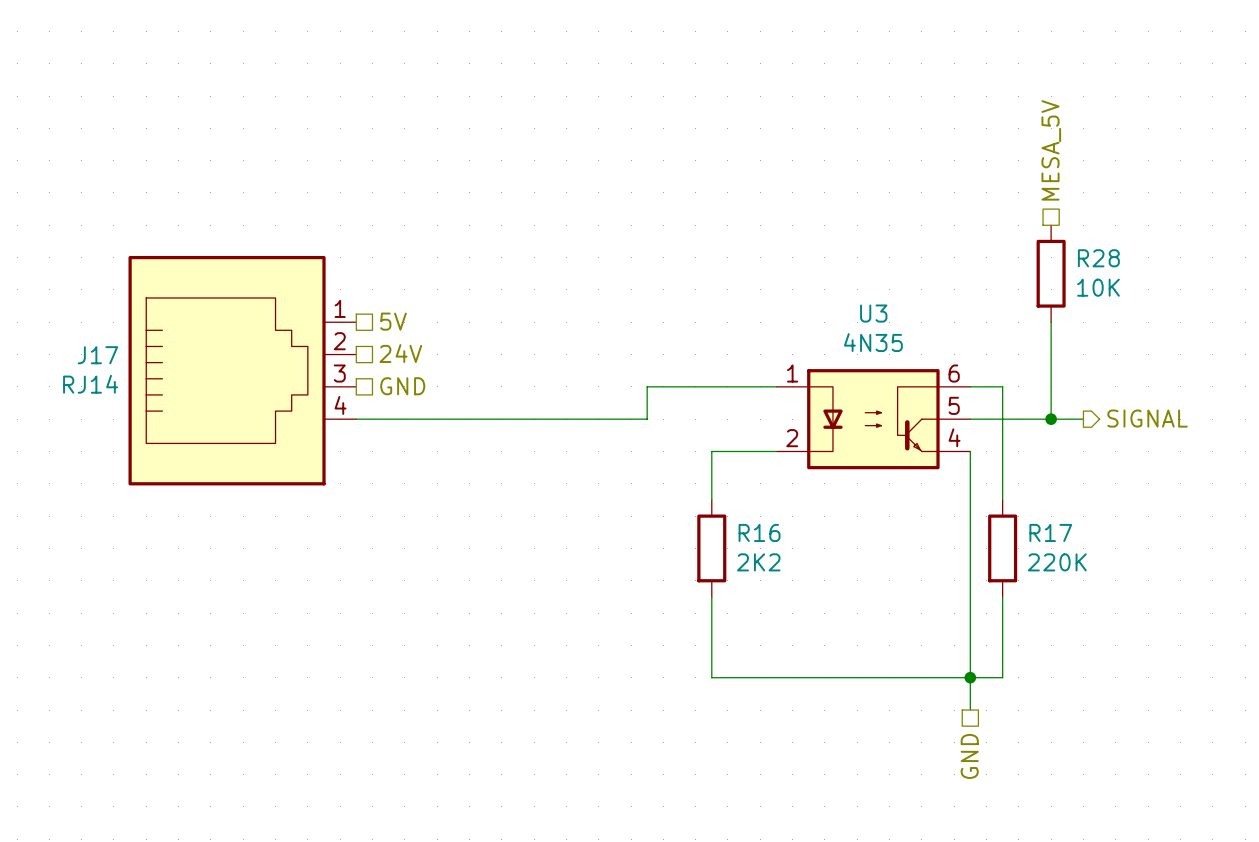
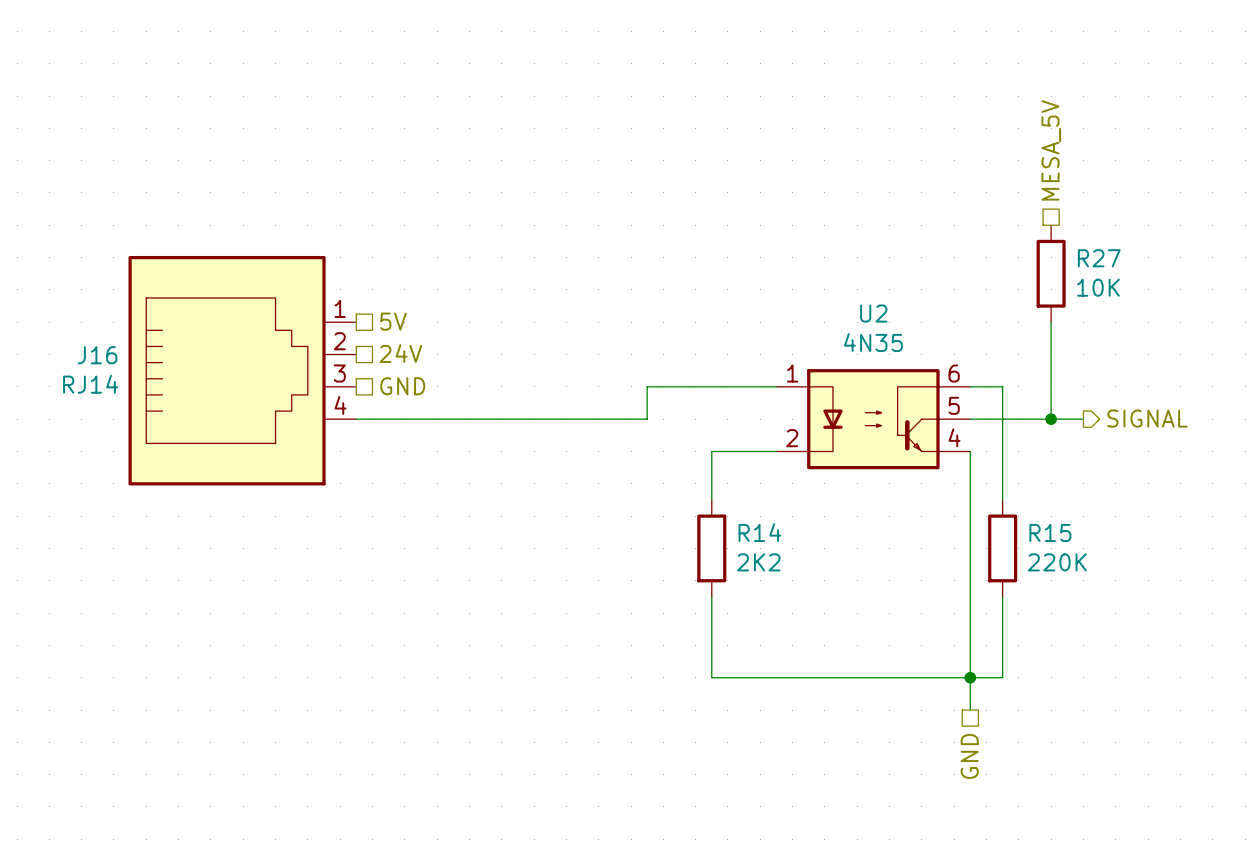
R28 name: R28 (1098, 258) -> R27 (1099, 258)
U3 name: U3 (873, 313) -> U2 (873, 313)
J17 name: J17 (97, 355) -> J16 (97, 355)
R16 name: R16 (759, 532) -> R14 (759, 532)
R17 name: R17 (1050, 532) -> R15 (1050, 532)

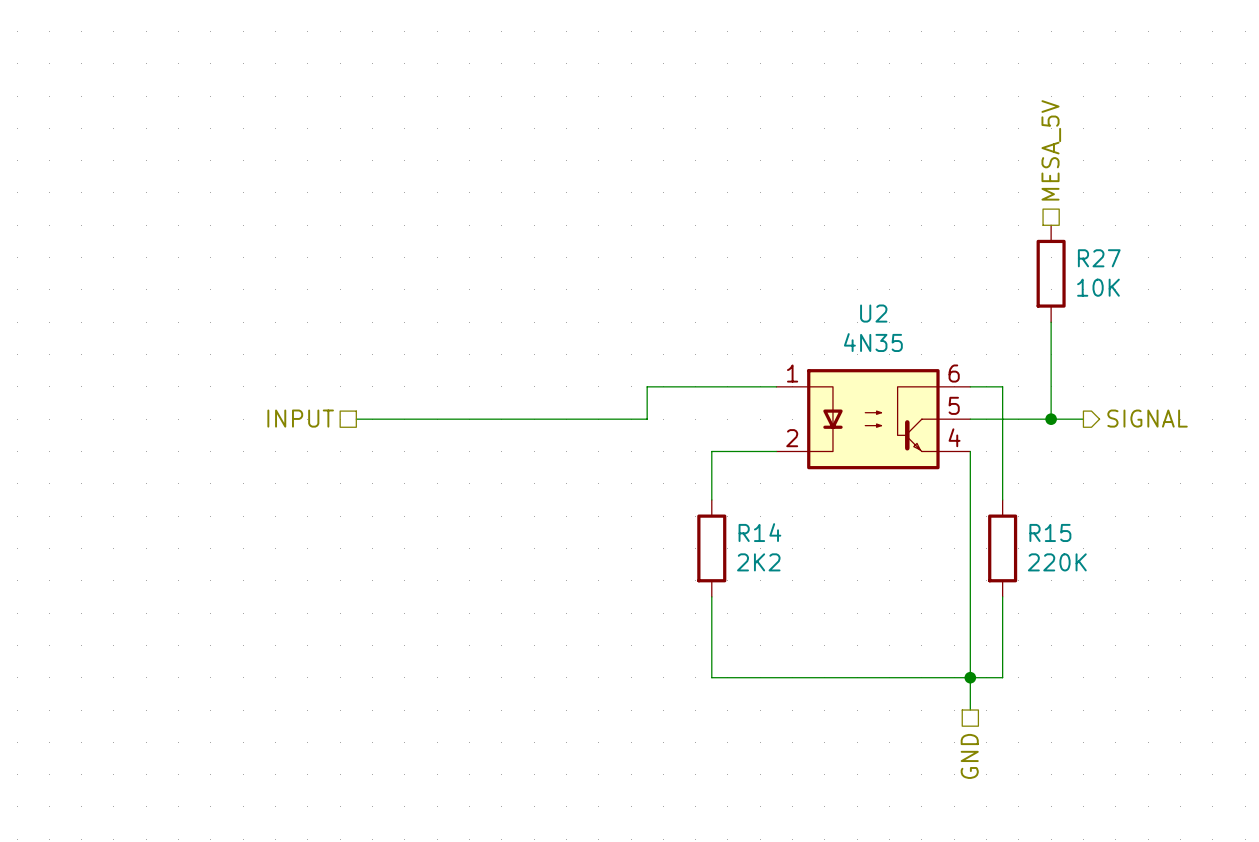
hierarchical label: 5V (393, 321) -> none
hierarchical label: 24V (400, 353) -> none
J16: RJ14 (242, 370) -> none
hierarchical label: GND (402, 386) -> none
hierarchical label: none -> INPUT (300, 418)

